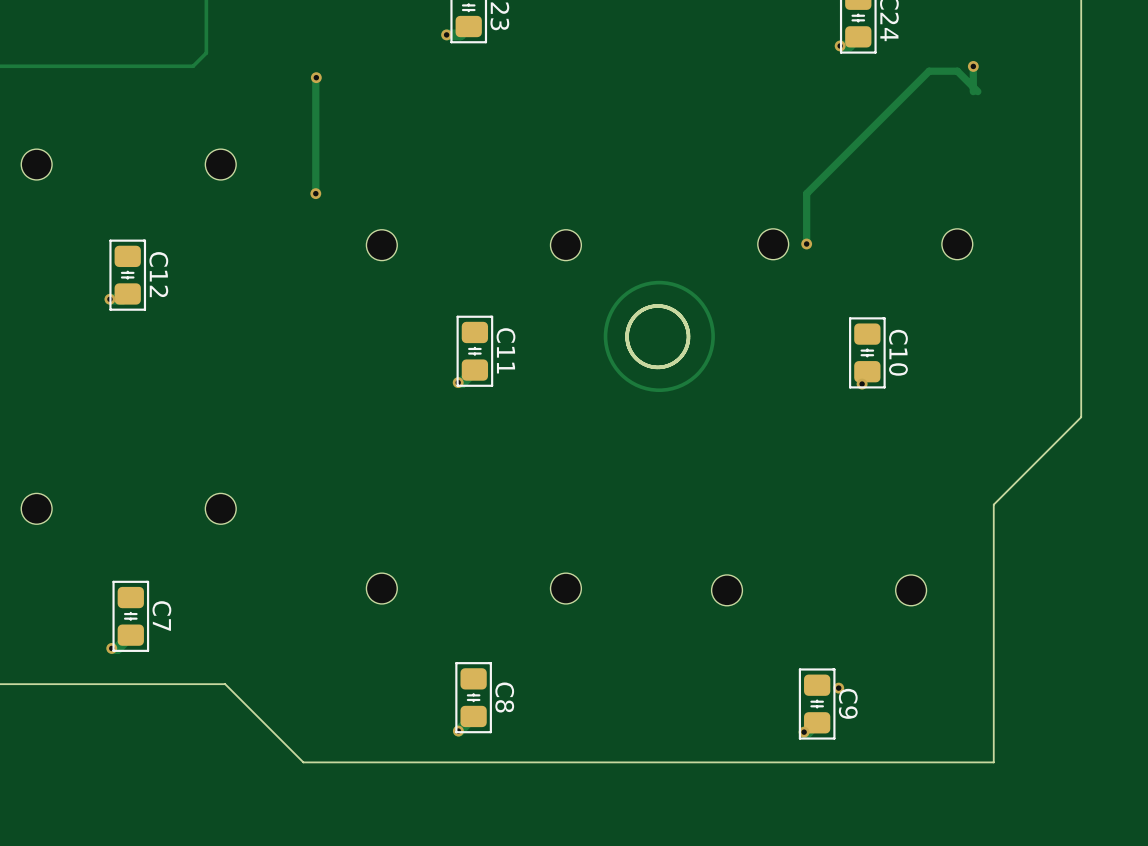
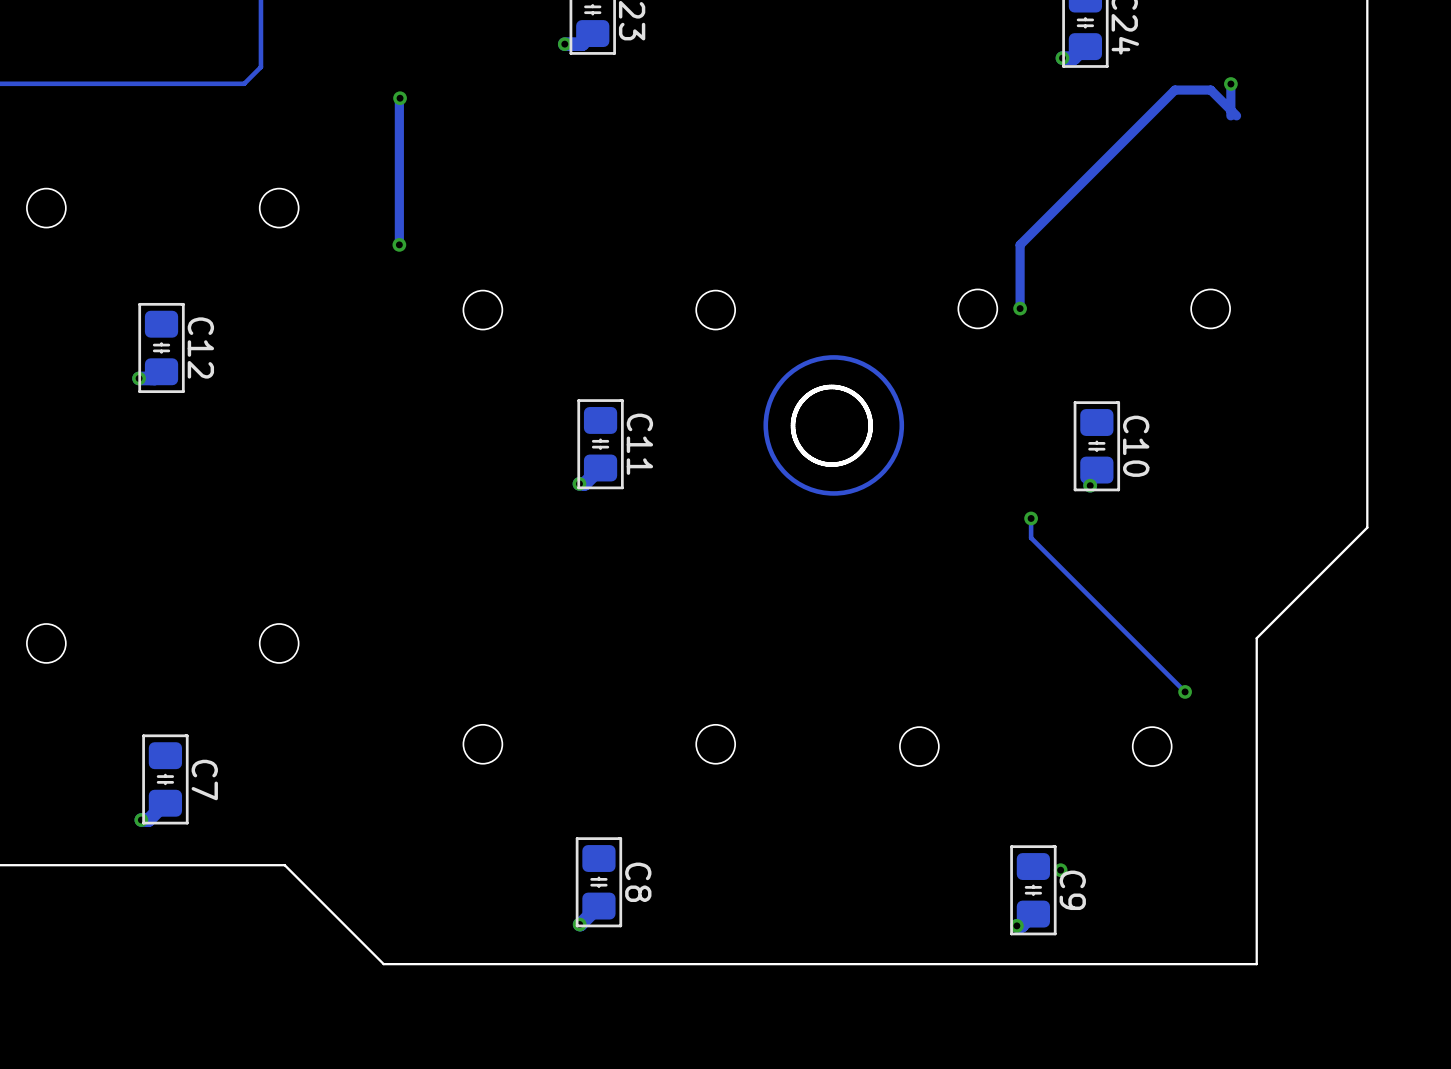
track: none -> (1031, 518) (1031, 537) (1185, 691)
via: none -> (1031, 518)
via: none -> (1185, 691)

